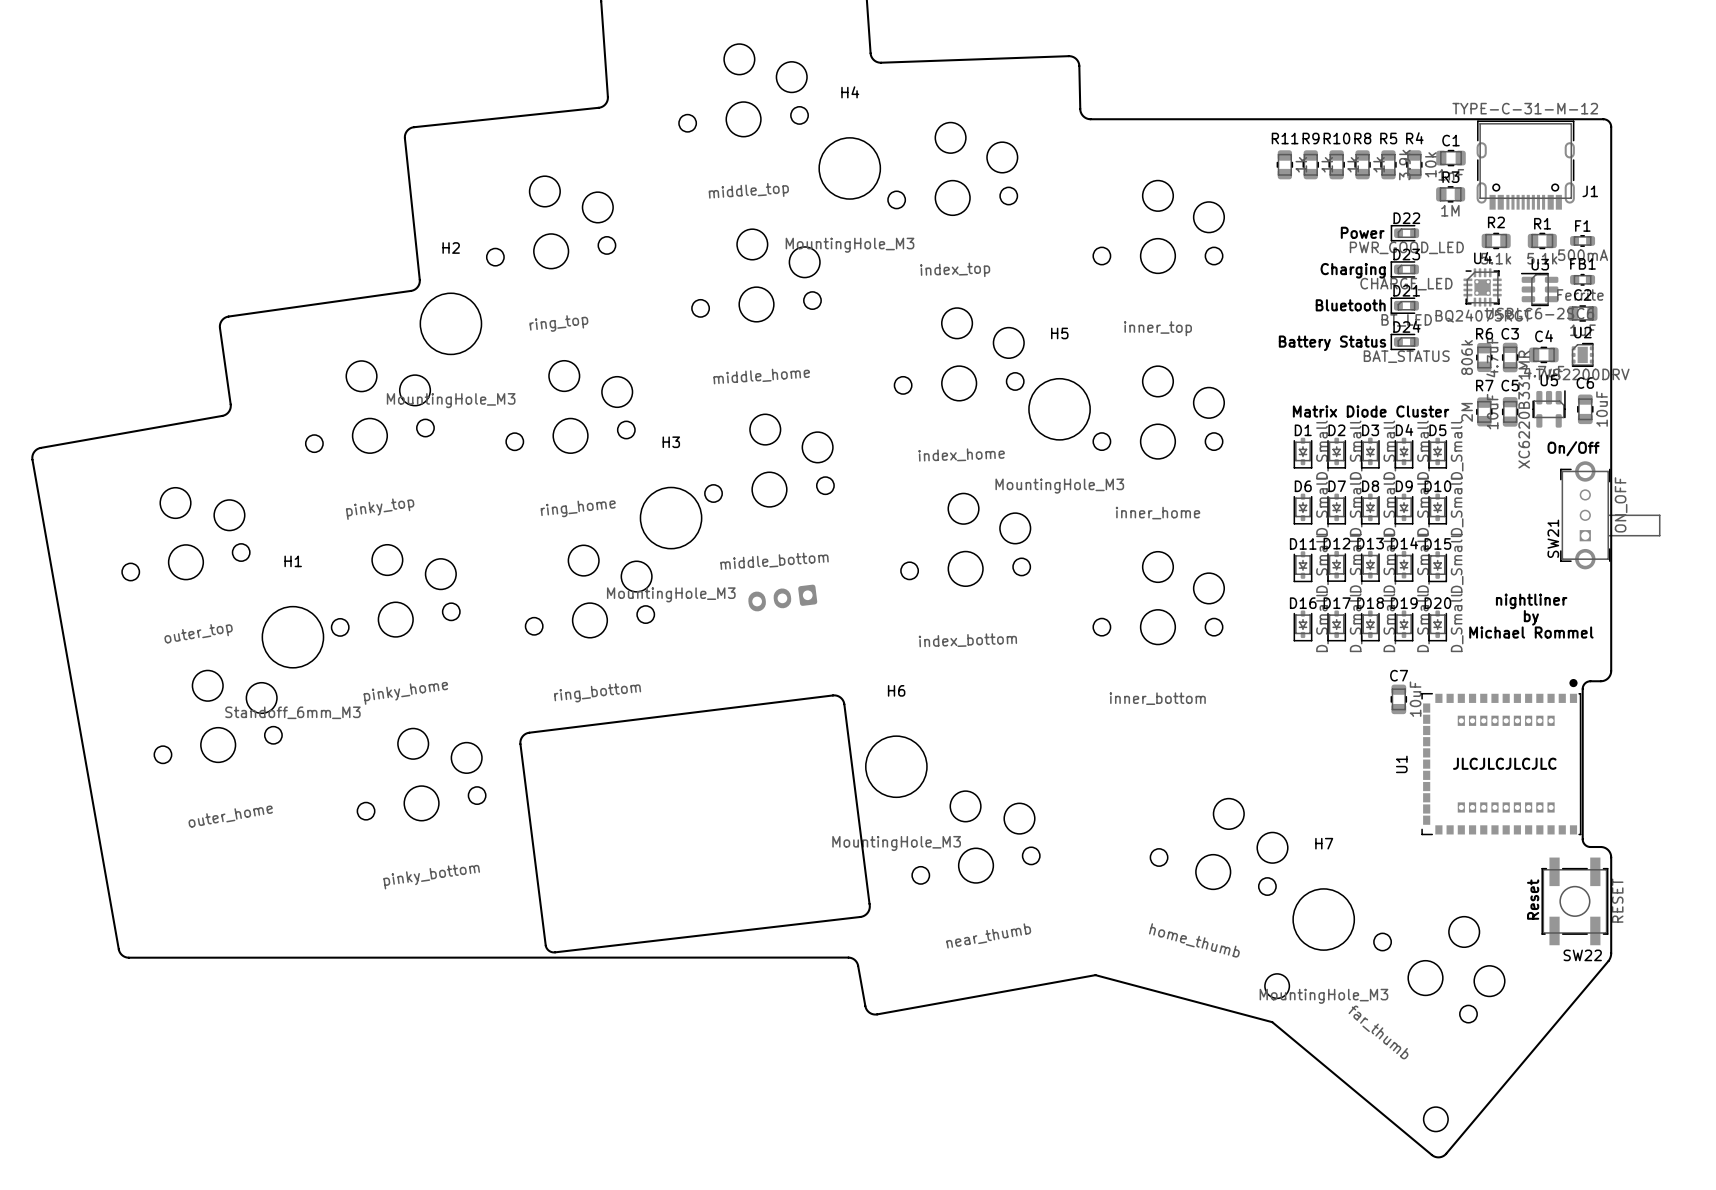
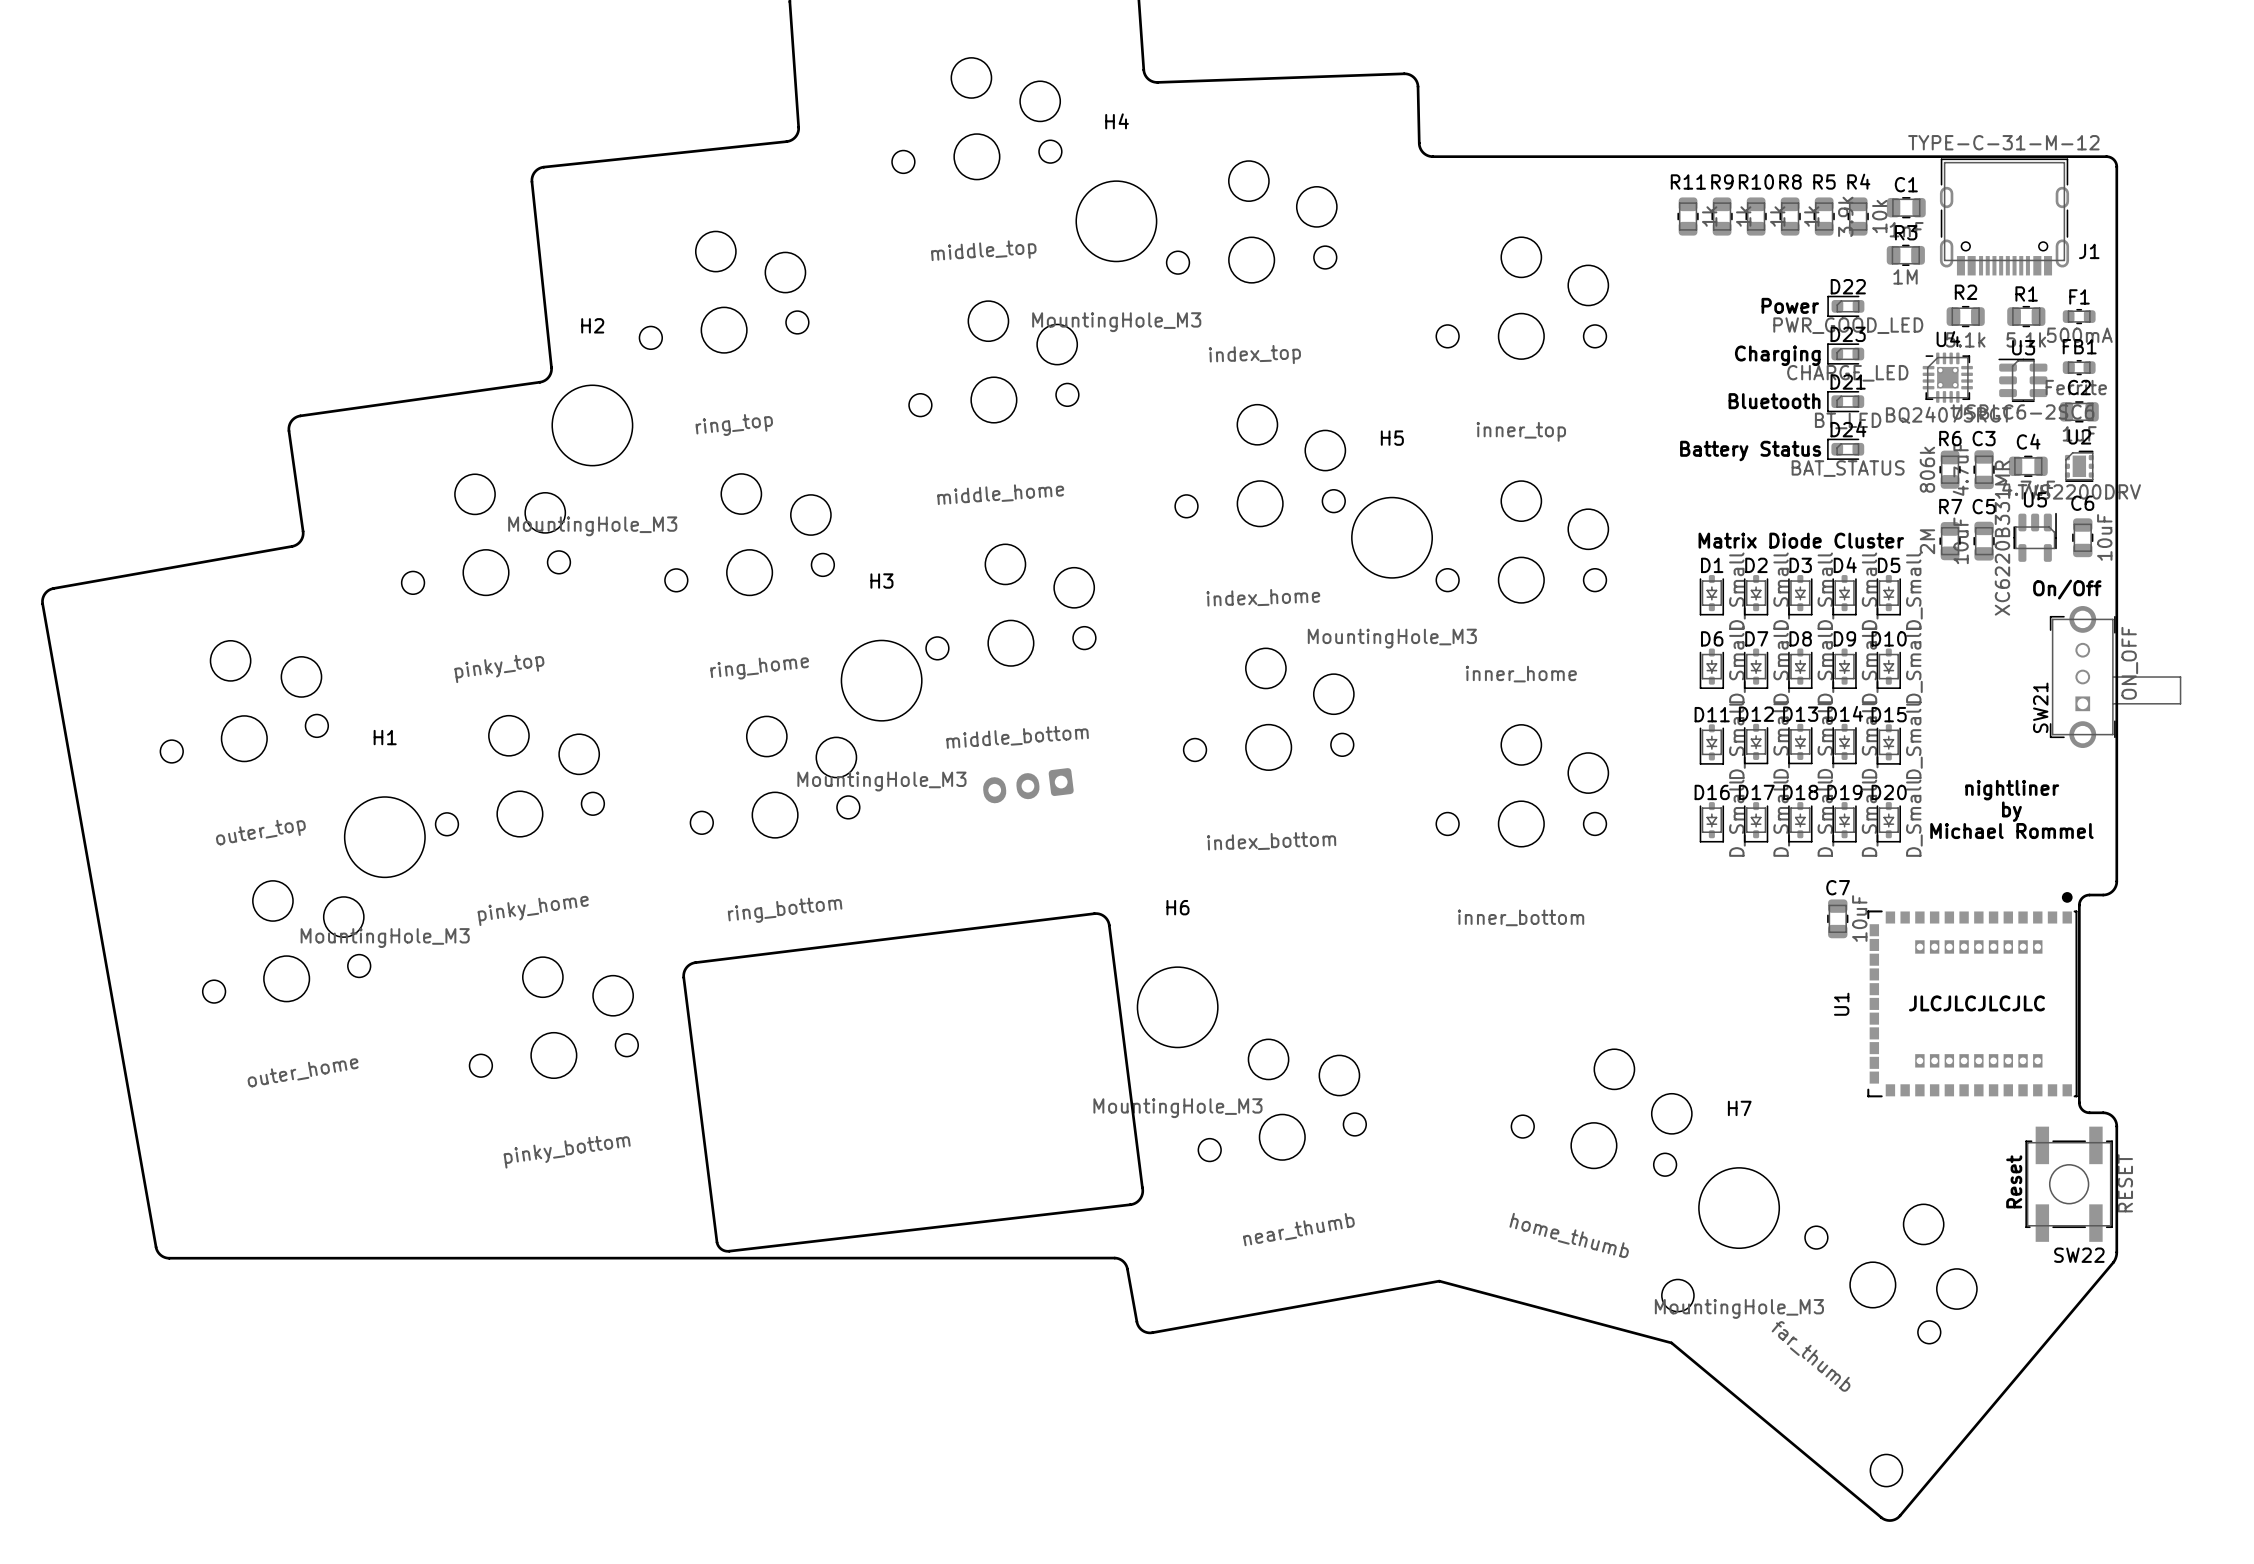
H1 value: Standoff_6mm_M3 (292, 712) -> MountingHole_M3 (385, 938)

